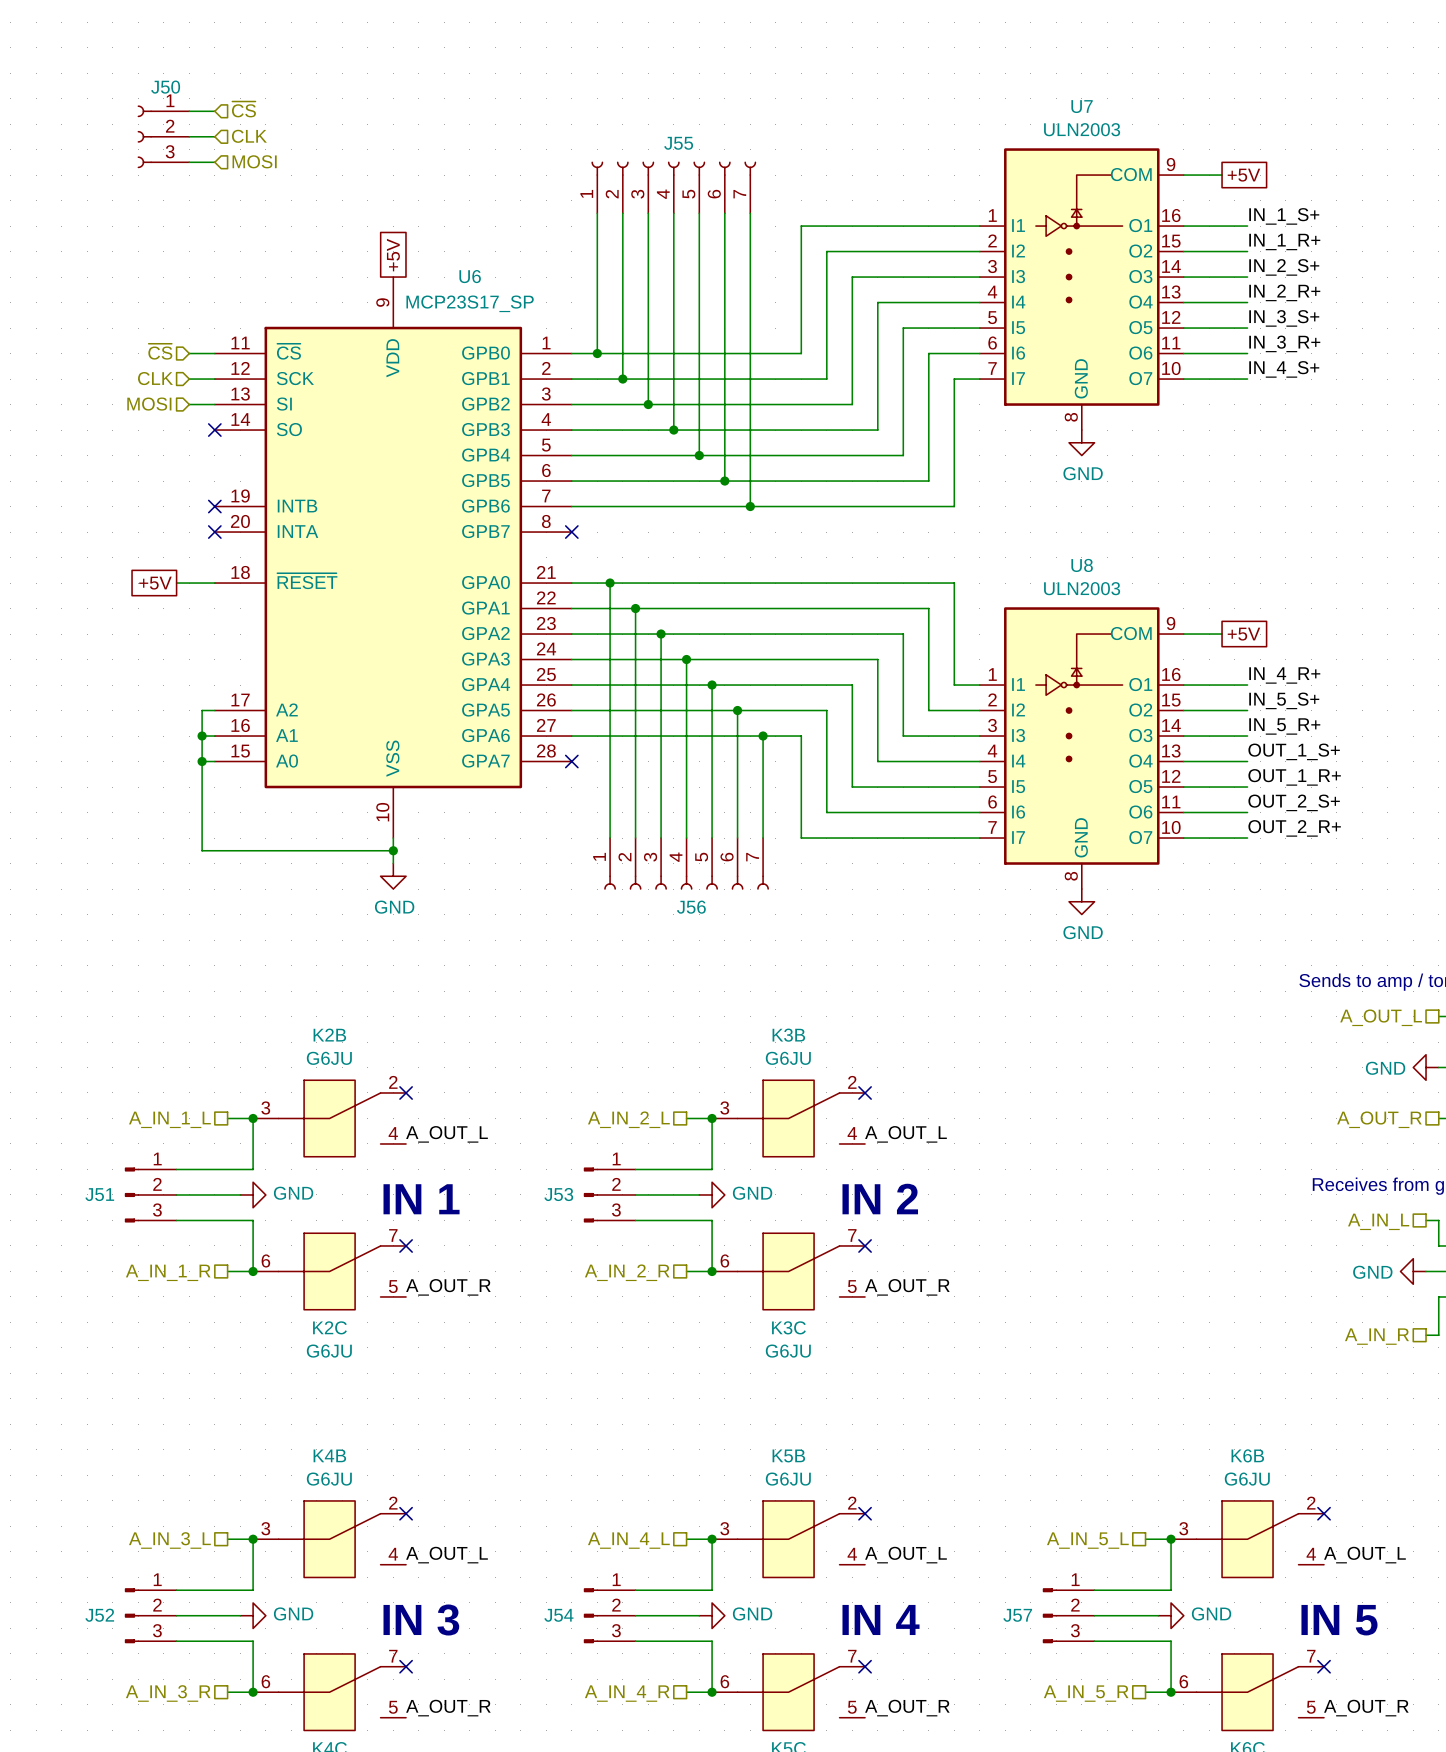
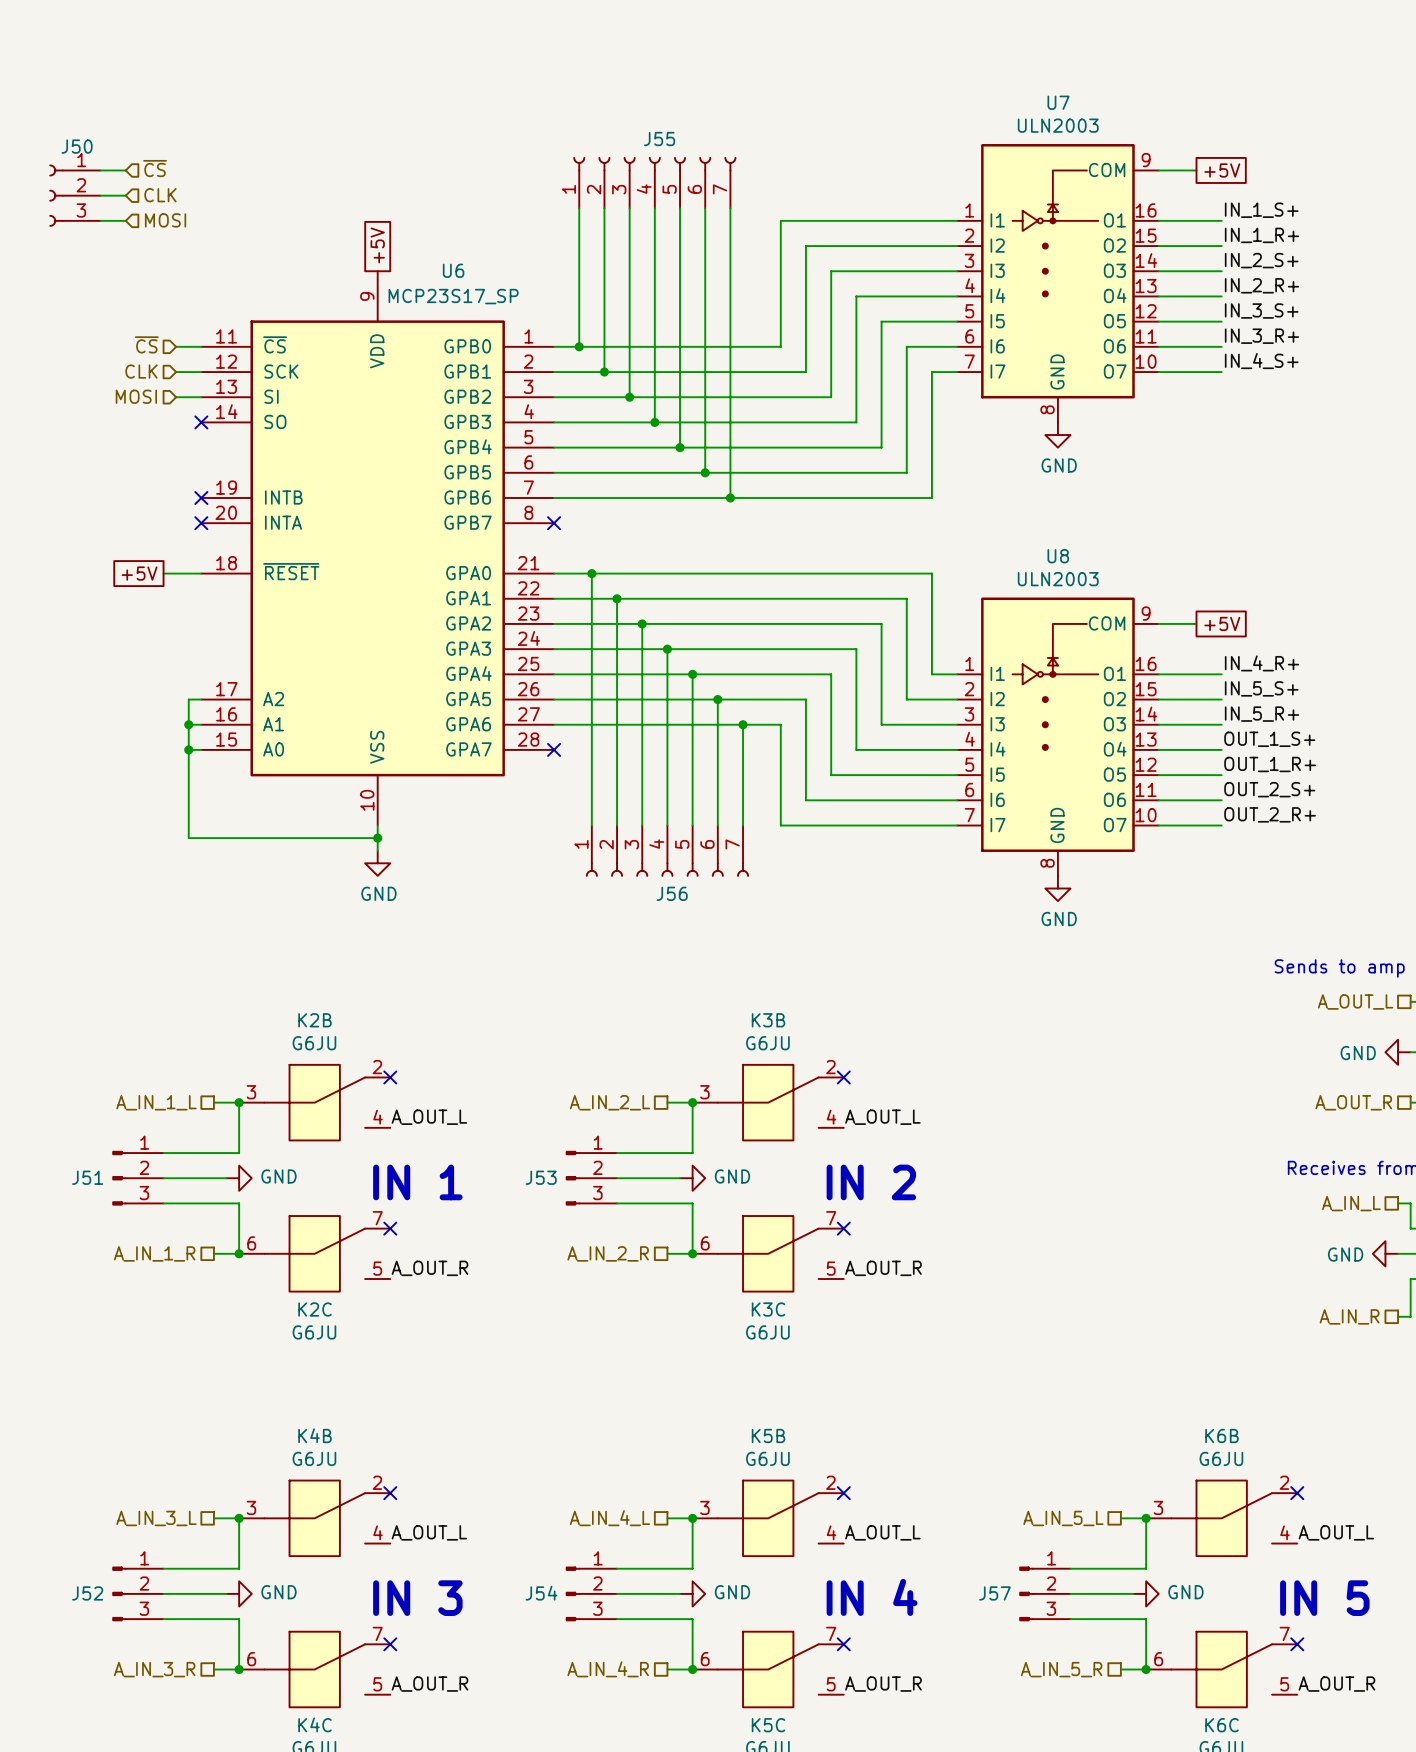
hierarchical label position: ~{CS} (243, 109) -> ~{CS} (155, 168)
wire: (189, 111) (214, 111) -> (100, 220) (125, 220)
J50 position: (163, 136) -> (75, 195)
wire: (189, 136) (214, 136) -> (100, 195) (125, 195)
hierarchical label position: CLK (249, 136) -> CLK (160, 195)
hierarchical label position: MOSI (254, 161) -> MOSI (165, 220)
wire: (189, 162) (214, 162) -> (100, 170) (125, 170)

